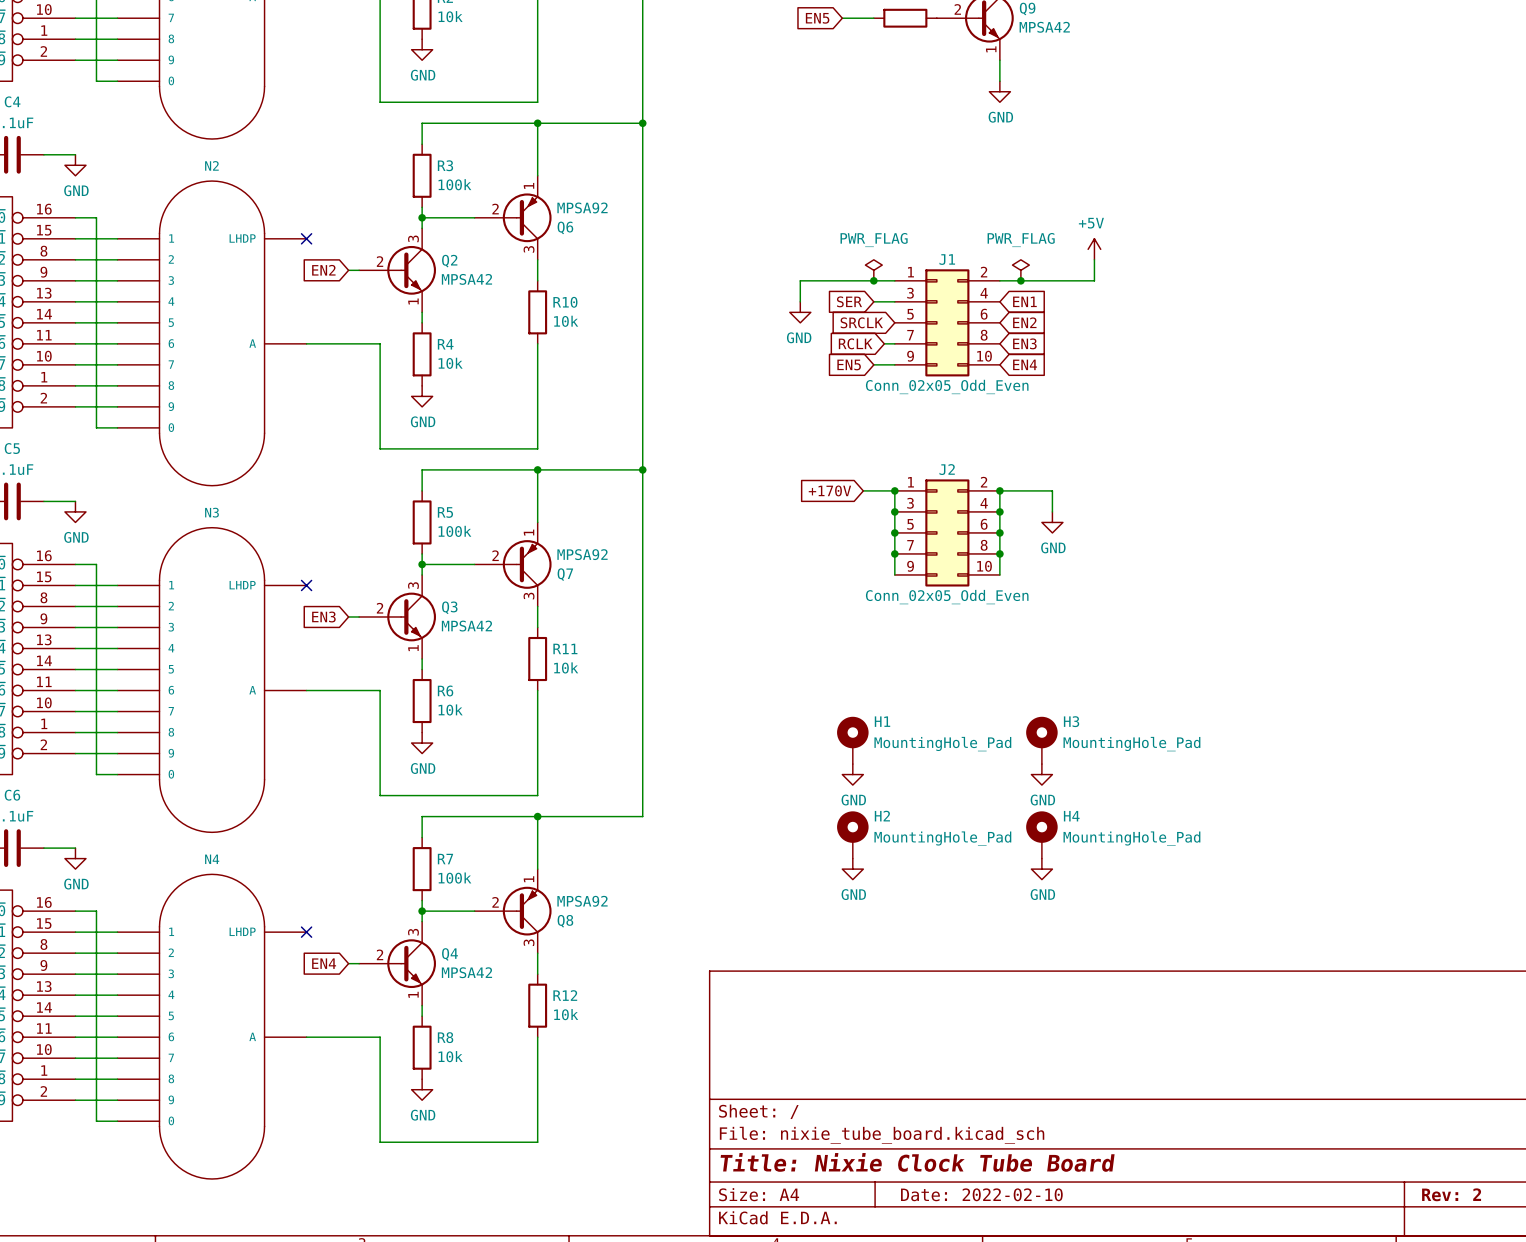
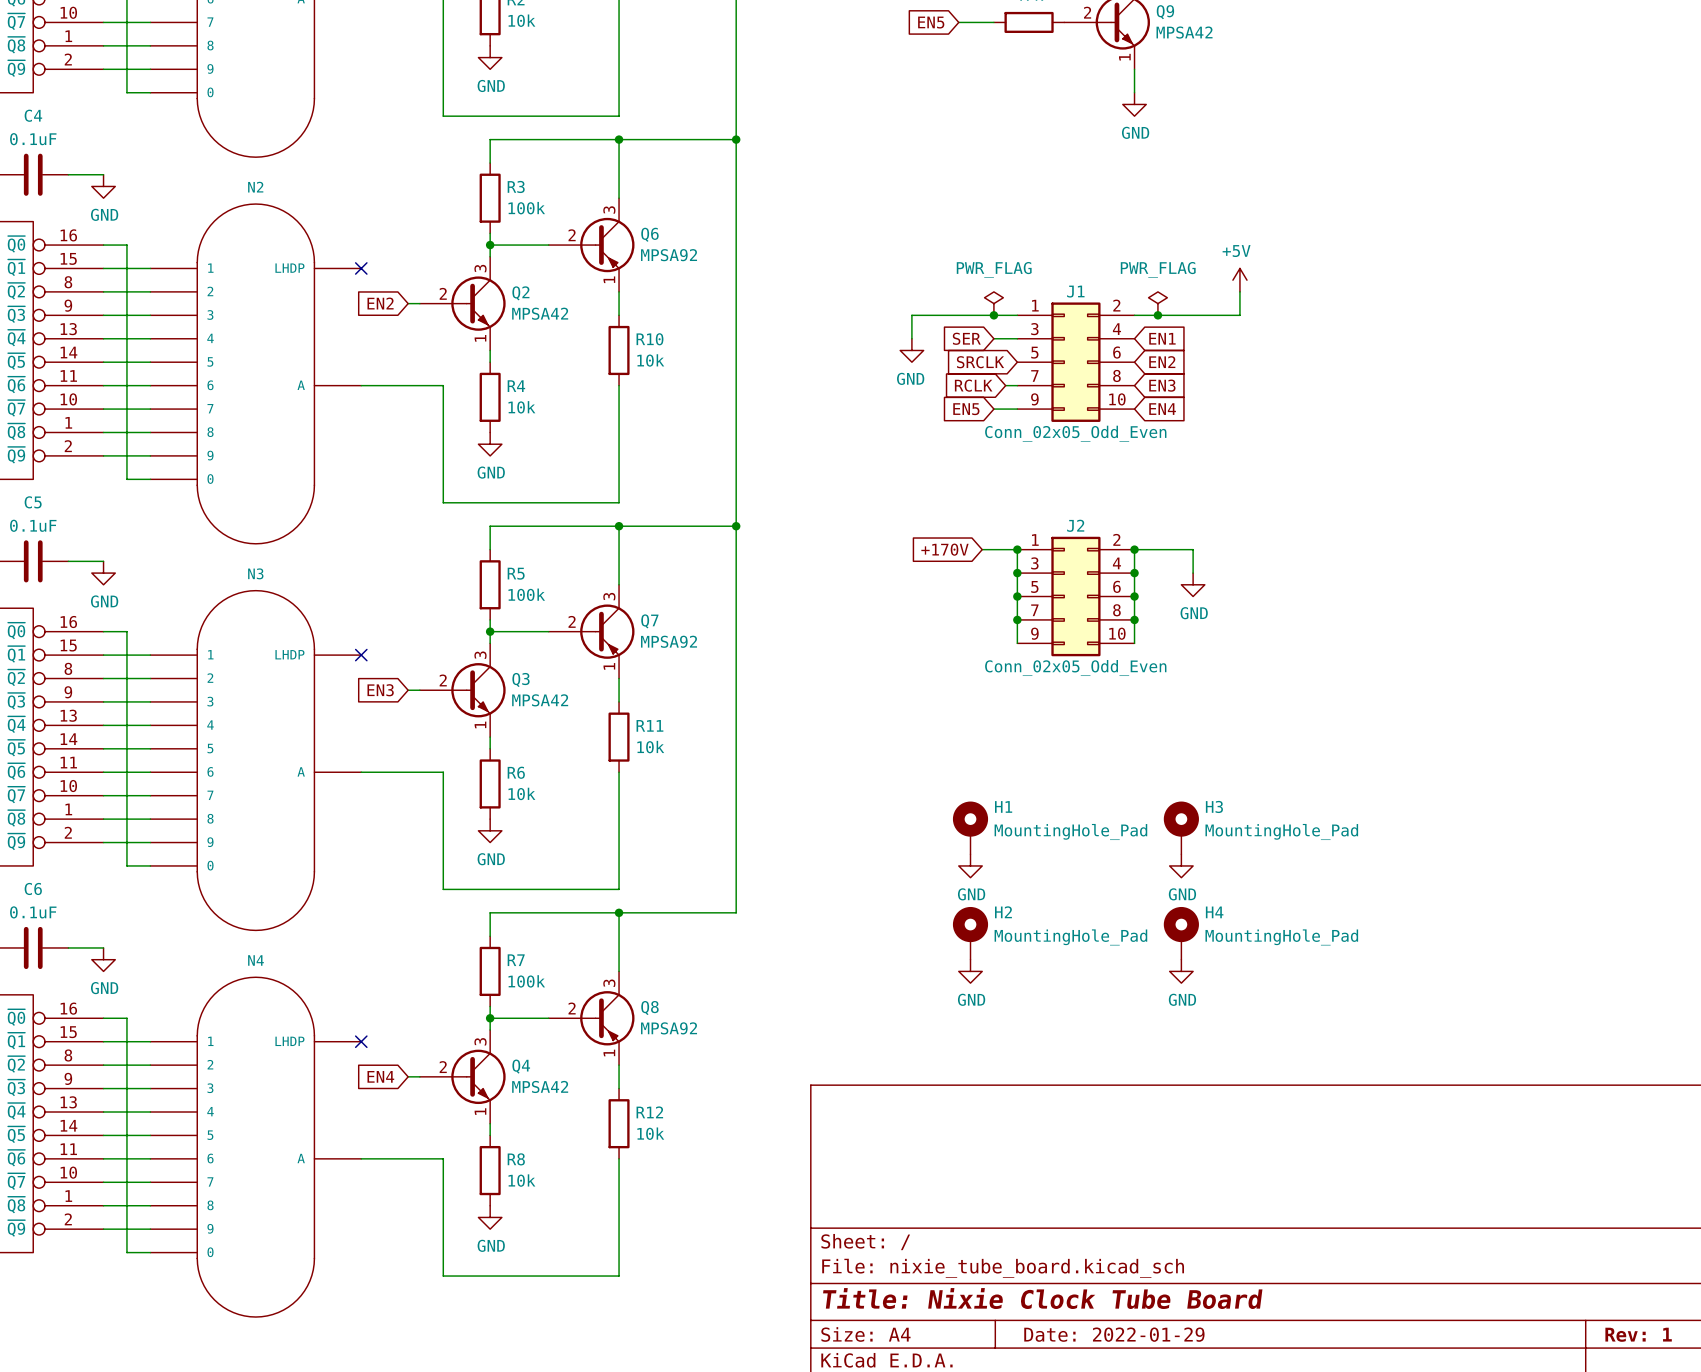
Q6 flip: as is (527, 217) -> up-down (607, 245)
Q7 flip: as is (527, 564) -> up-down (607, 631)
Q8 flip: as is (527, 911) -> up-down (607, 1018)
title block: Date: 2022-02-10 (981, 1194) -> Date: 2022-01-29 (1114, 1334)
title block: Rev: 2 (1451, 1194) -> Rev: 1 (1638, 1334)

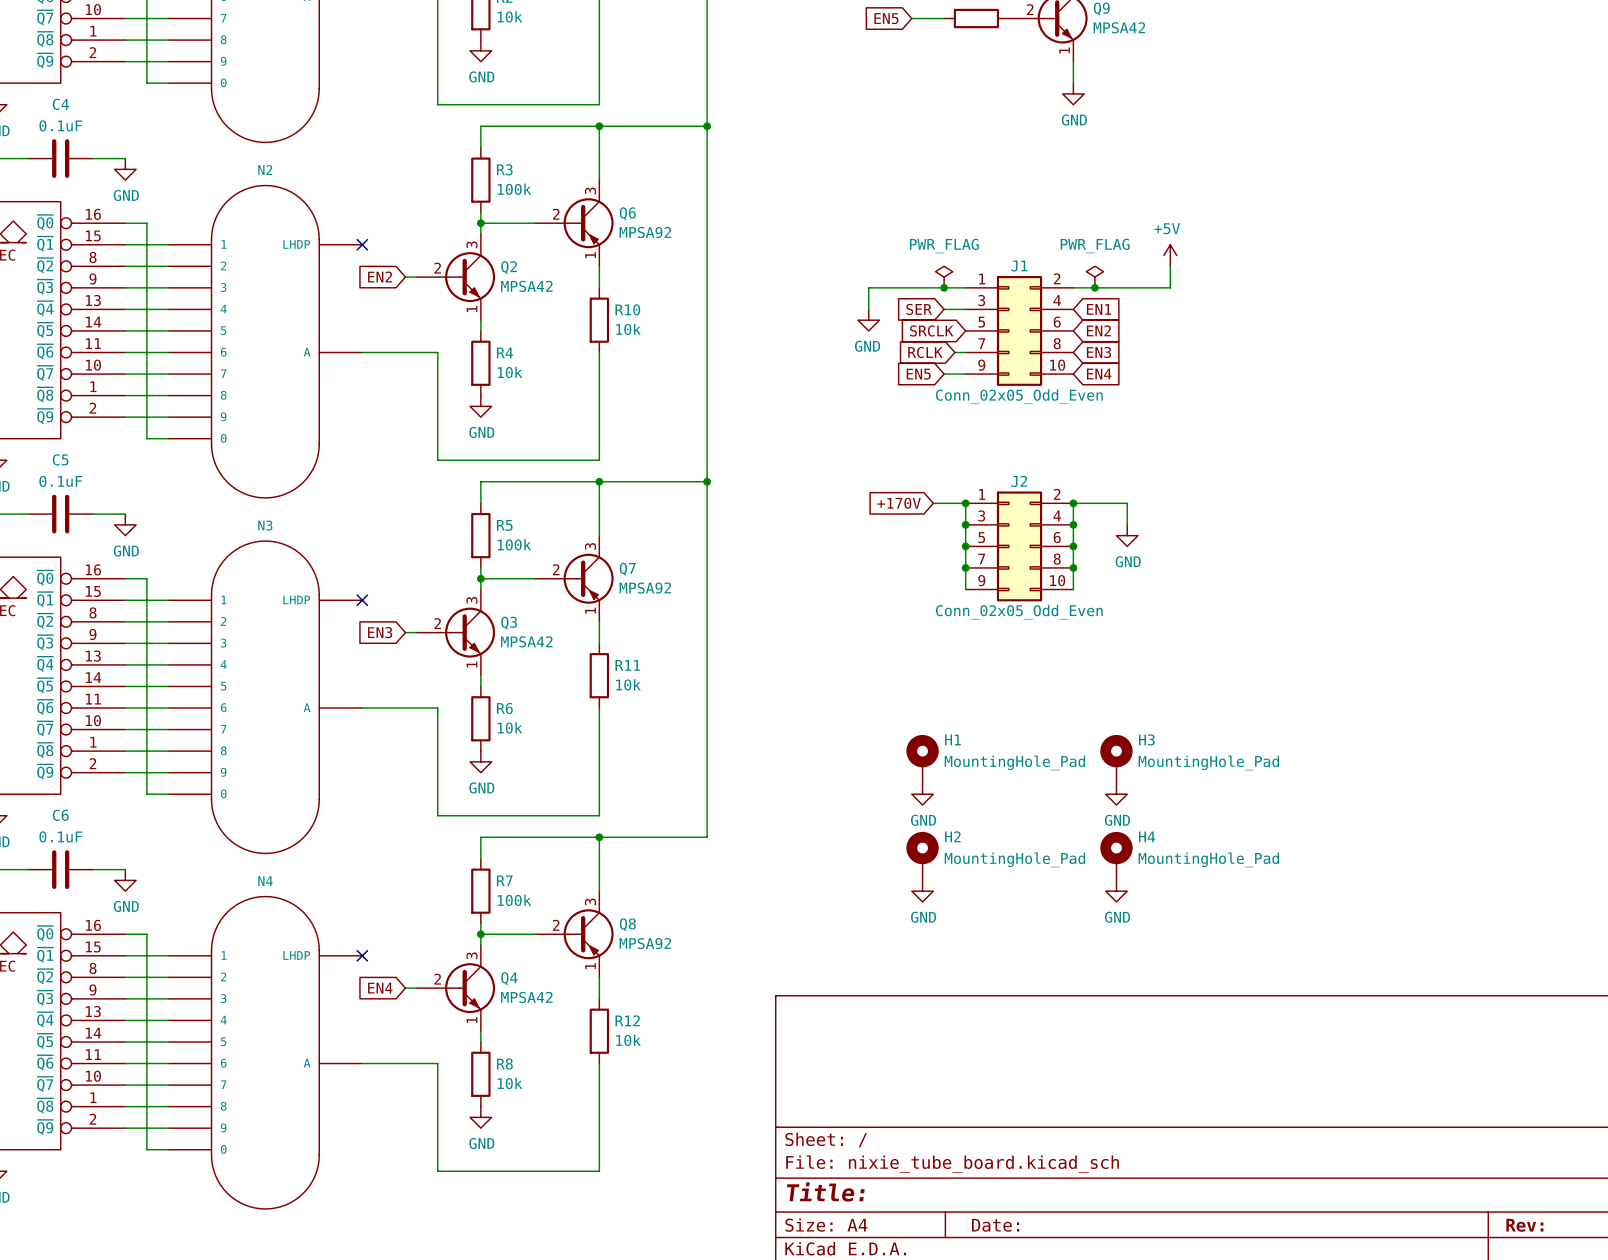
title block: Title: Nixie Clock Tube Board (1042, 1298) -> Title: (825, 1191)
title block: Date: 2022-01-29 (1114, 1334) -> Date: (995, 1225)
title block: Rev: 1 (1638, 1334) -> Rev: (1524, 1225)

